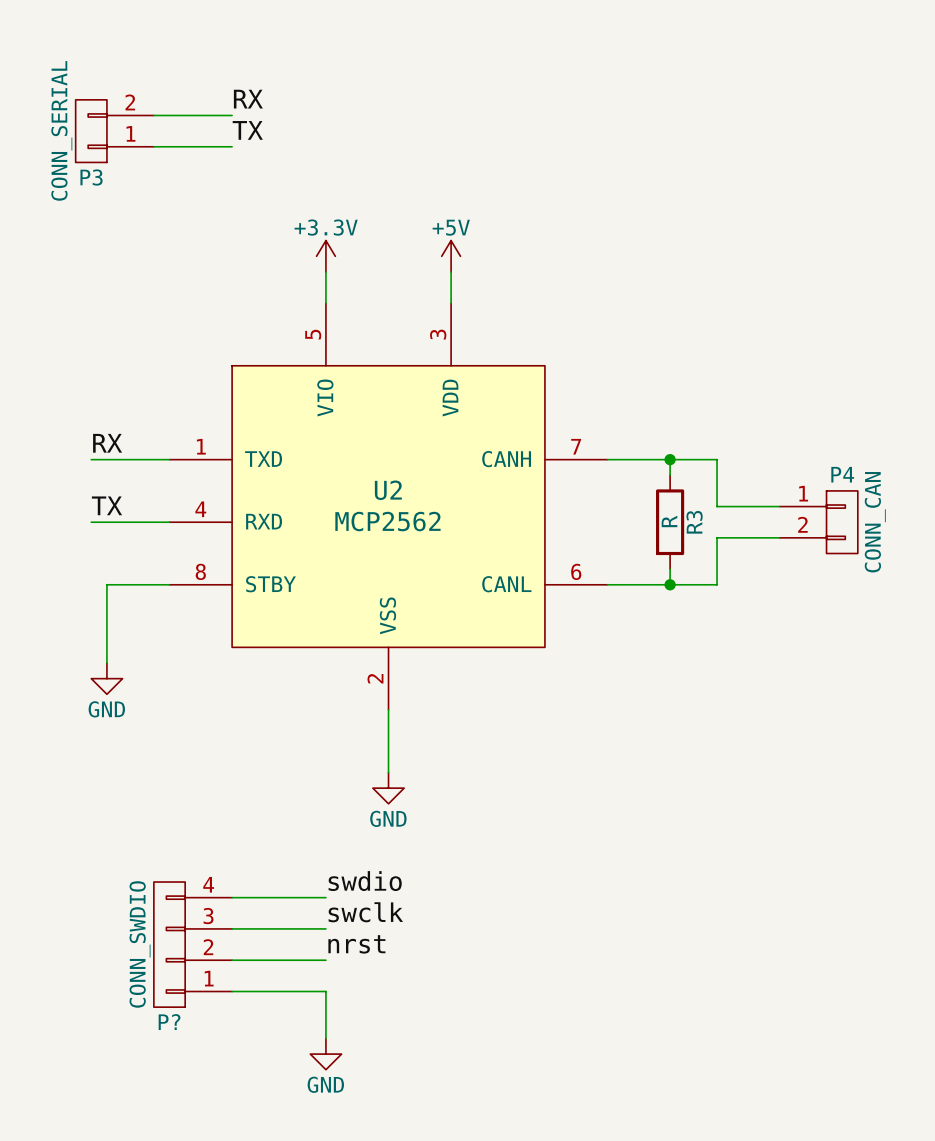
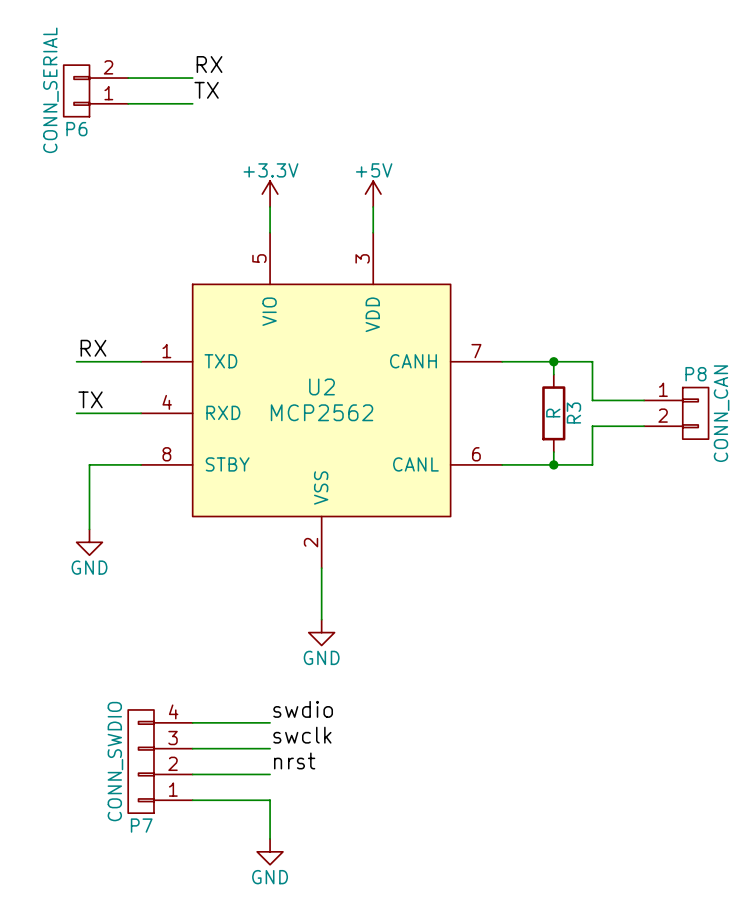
P3 name: P3 (91, 177) -> P6 (76, 129)
P4 name: P4 (842, 474) -> P8 (695, 374)
P? name: P? (169, 1022) -> P7 (141, 825)

